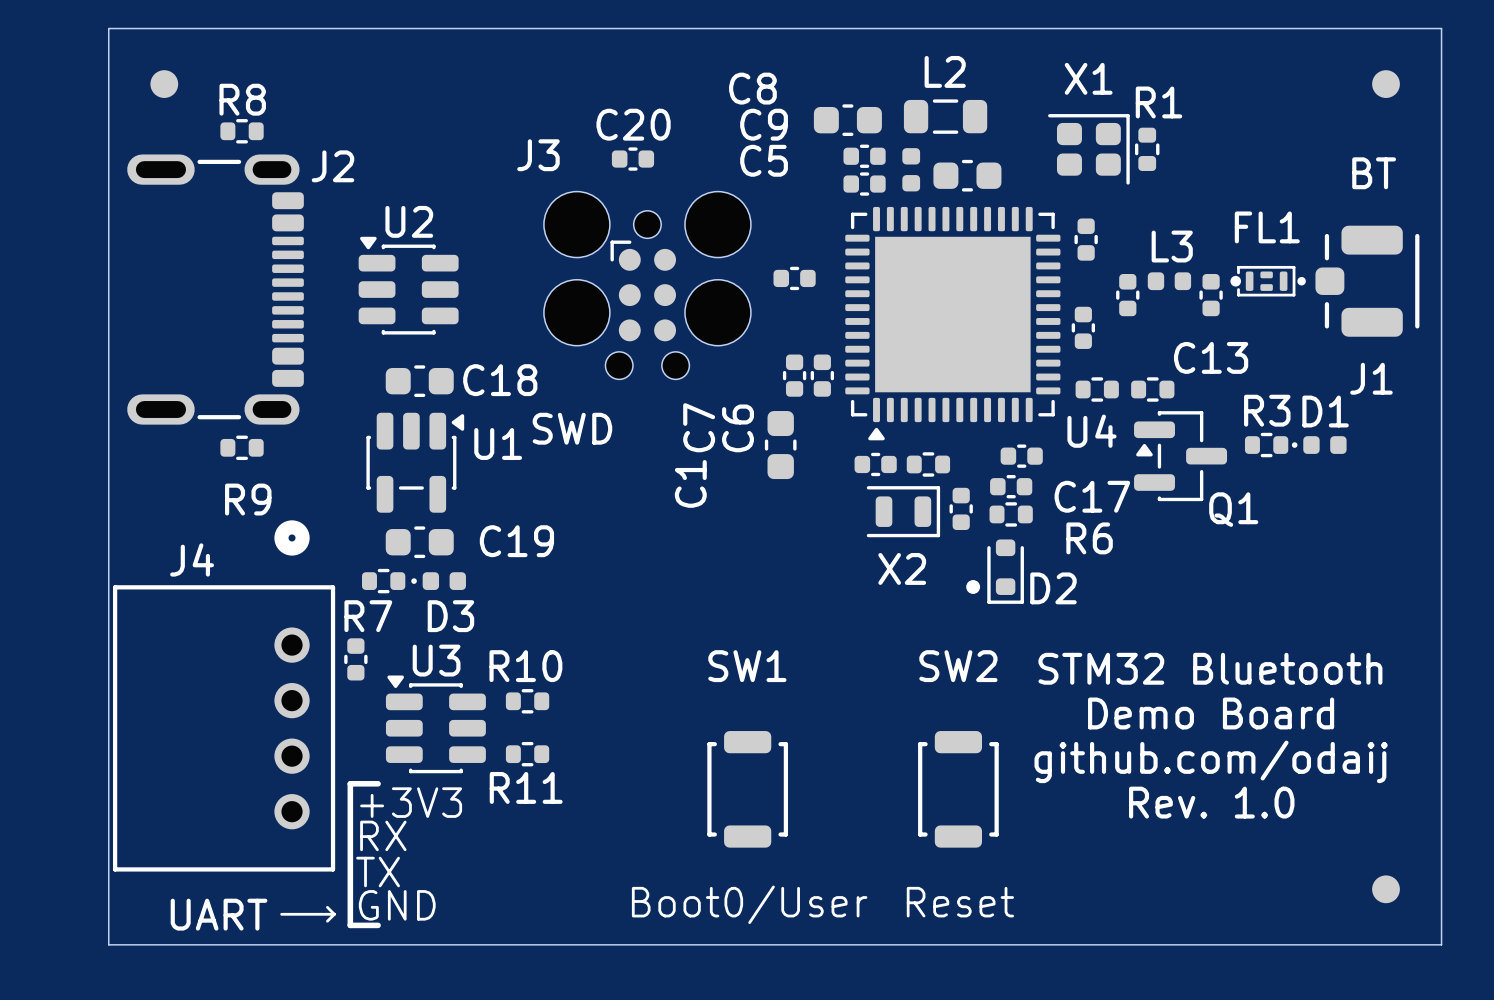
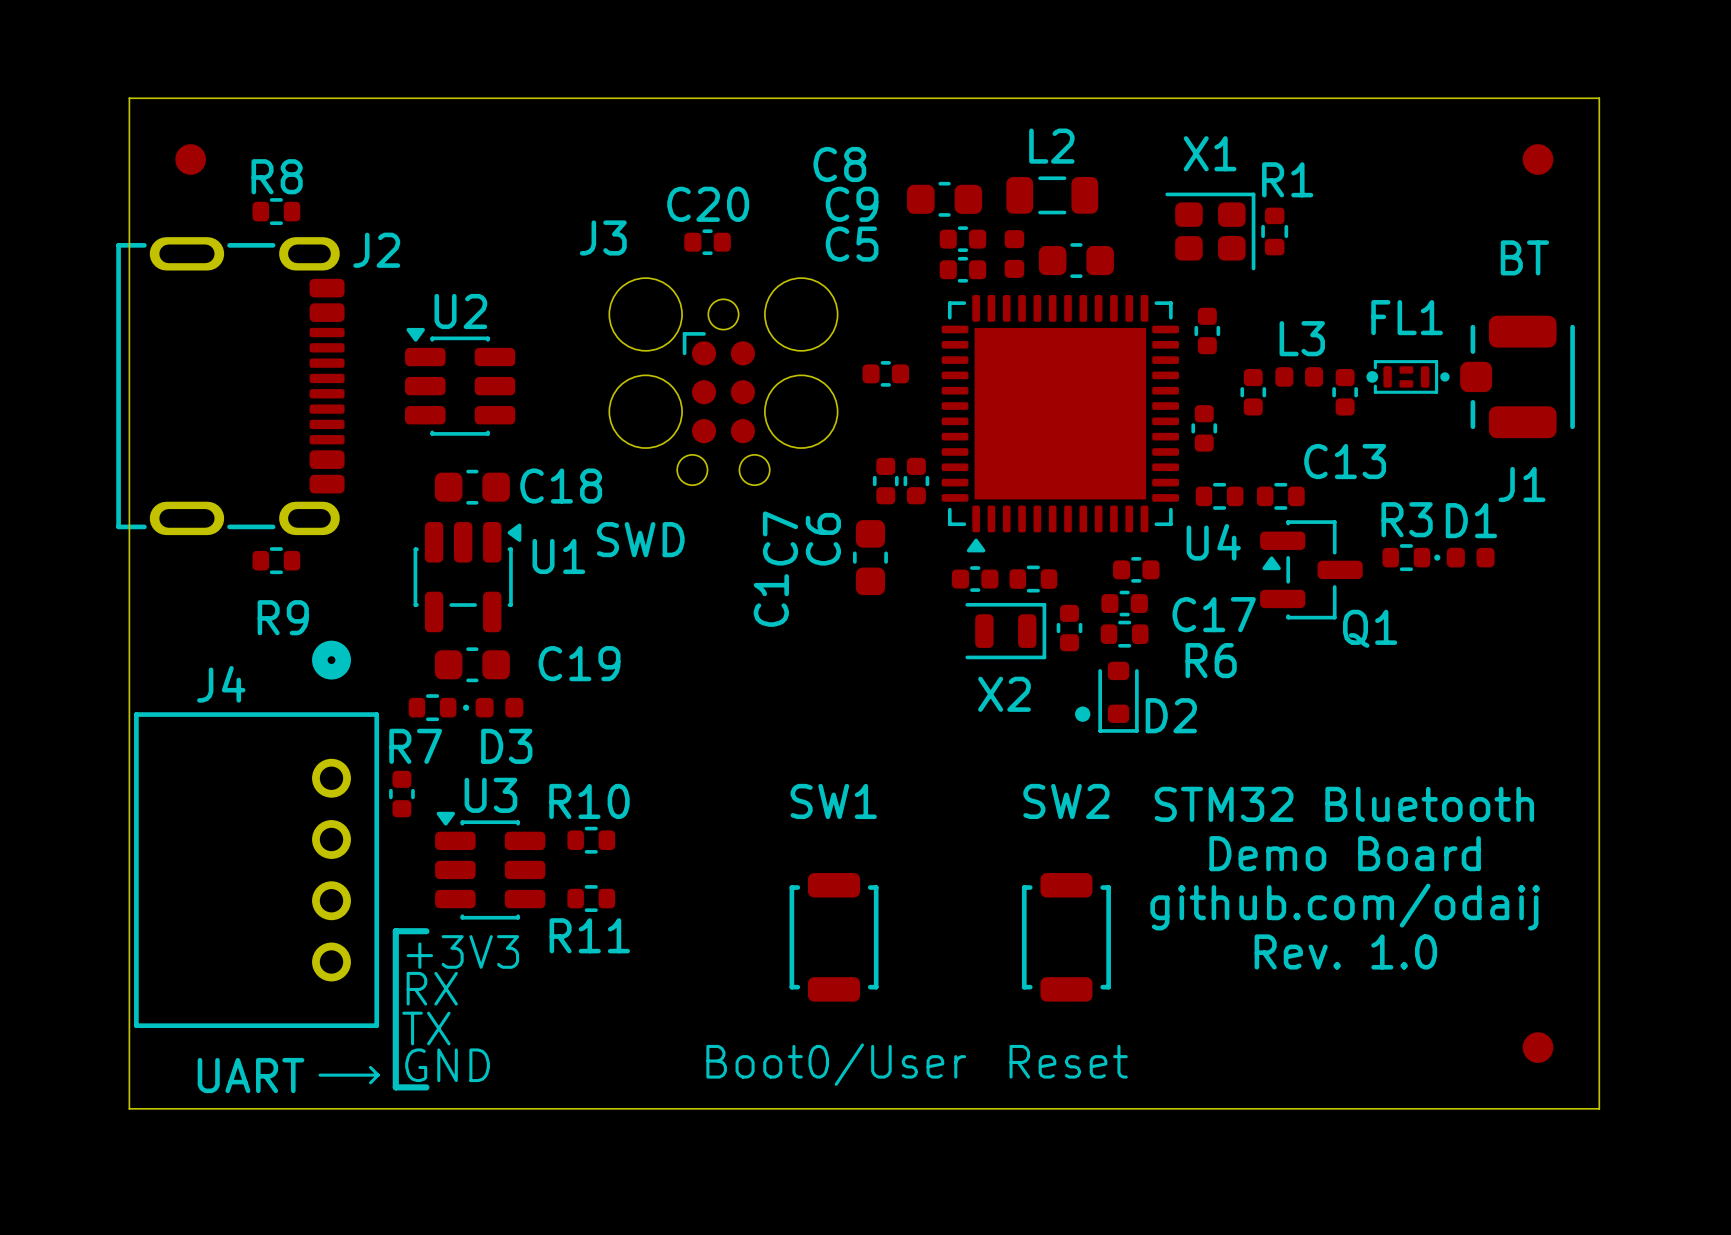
J2 footprint: [127, 154, 304, 425] -> [116, 237, 345, 536]

